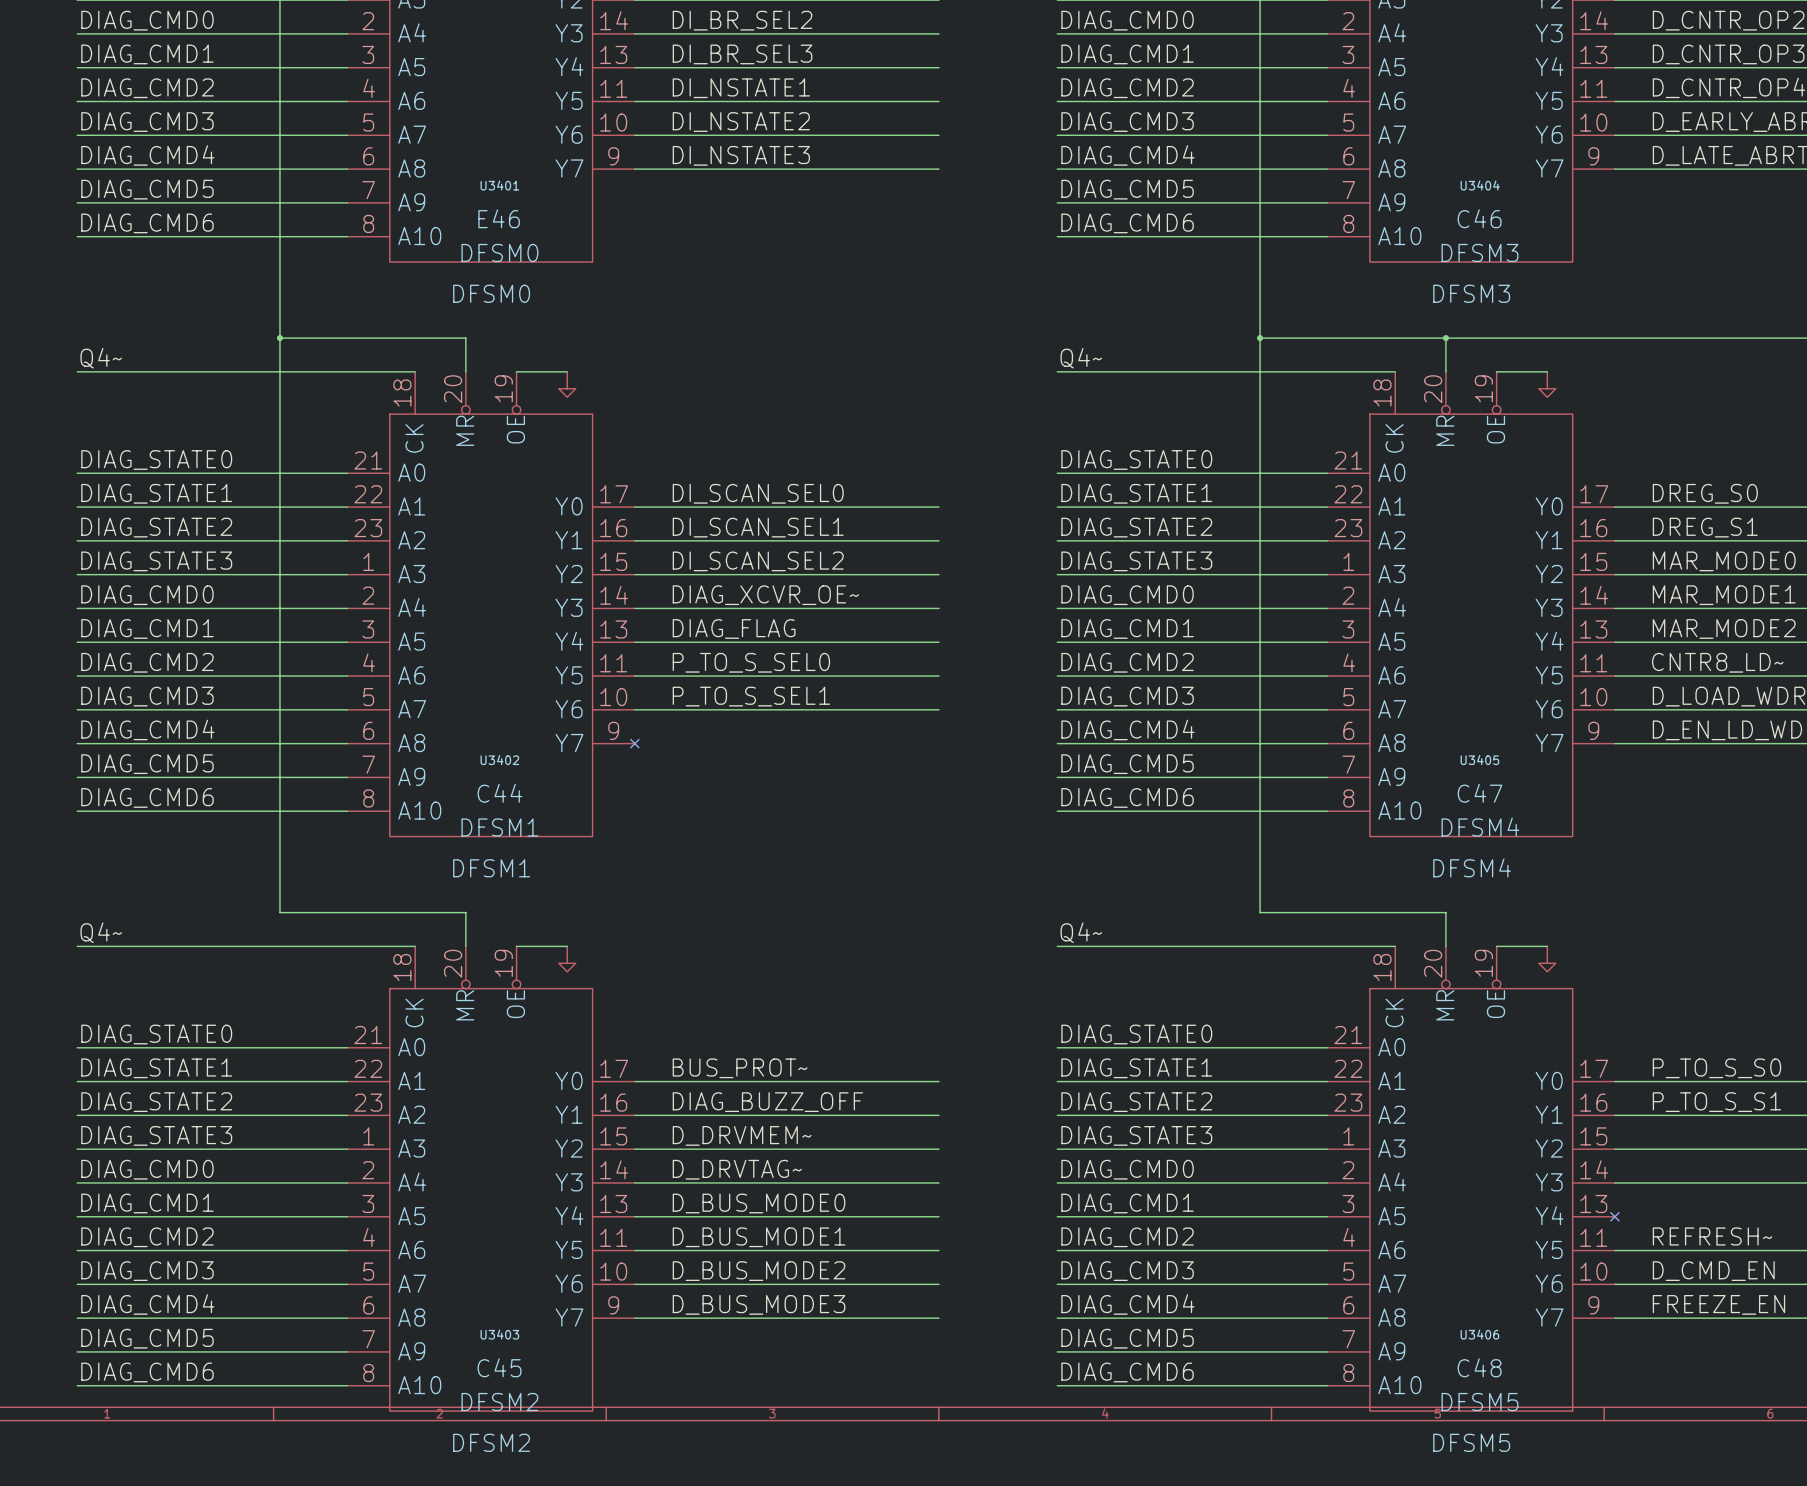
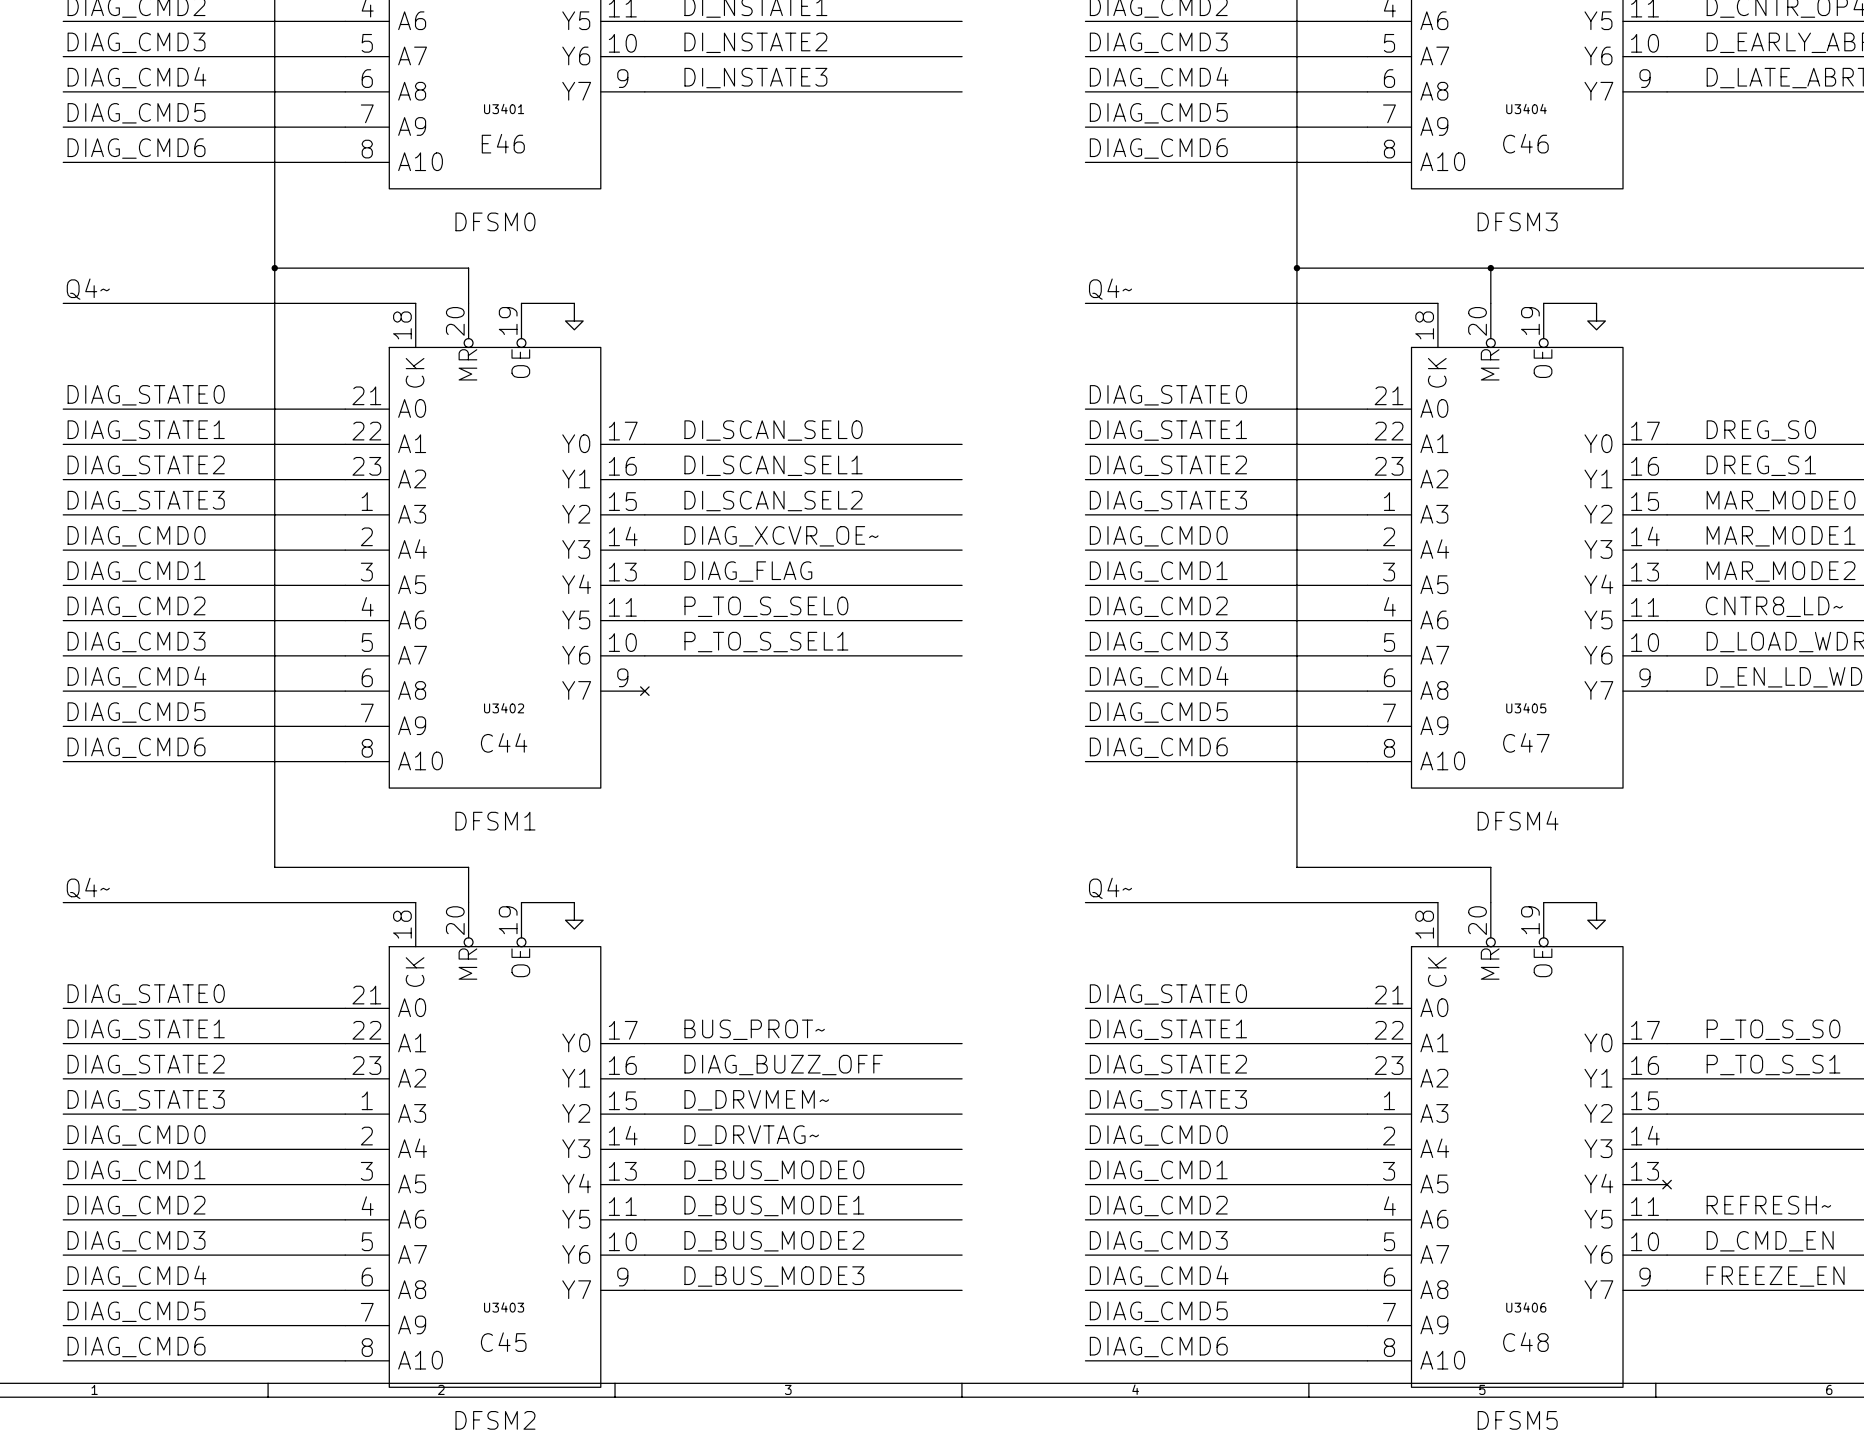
U3401 value: DFSM0 (499, 252) -> none
U3404 value: DFSM3 (1479, 252) -> none
U3402 value: DFSM1 (499, 827) -> none
U3405 value: DFSM4 (1480, 827) -> none
U3403 value: DFSM2 (499, 1402) -> none
U3406 value: DFSM5 (1479, 1402) -> none

